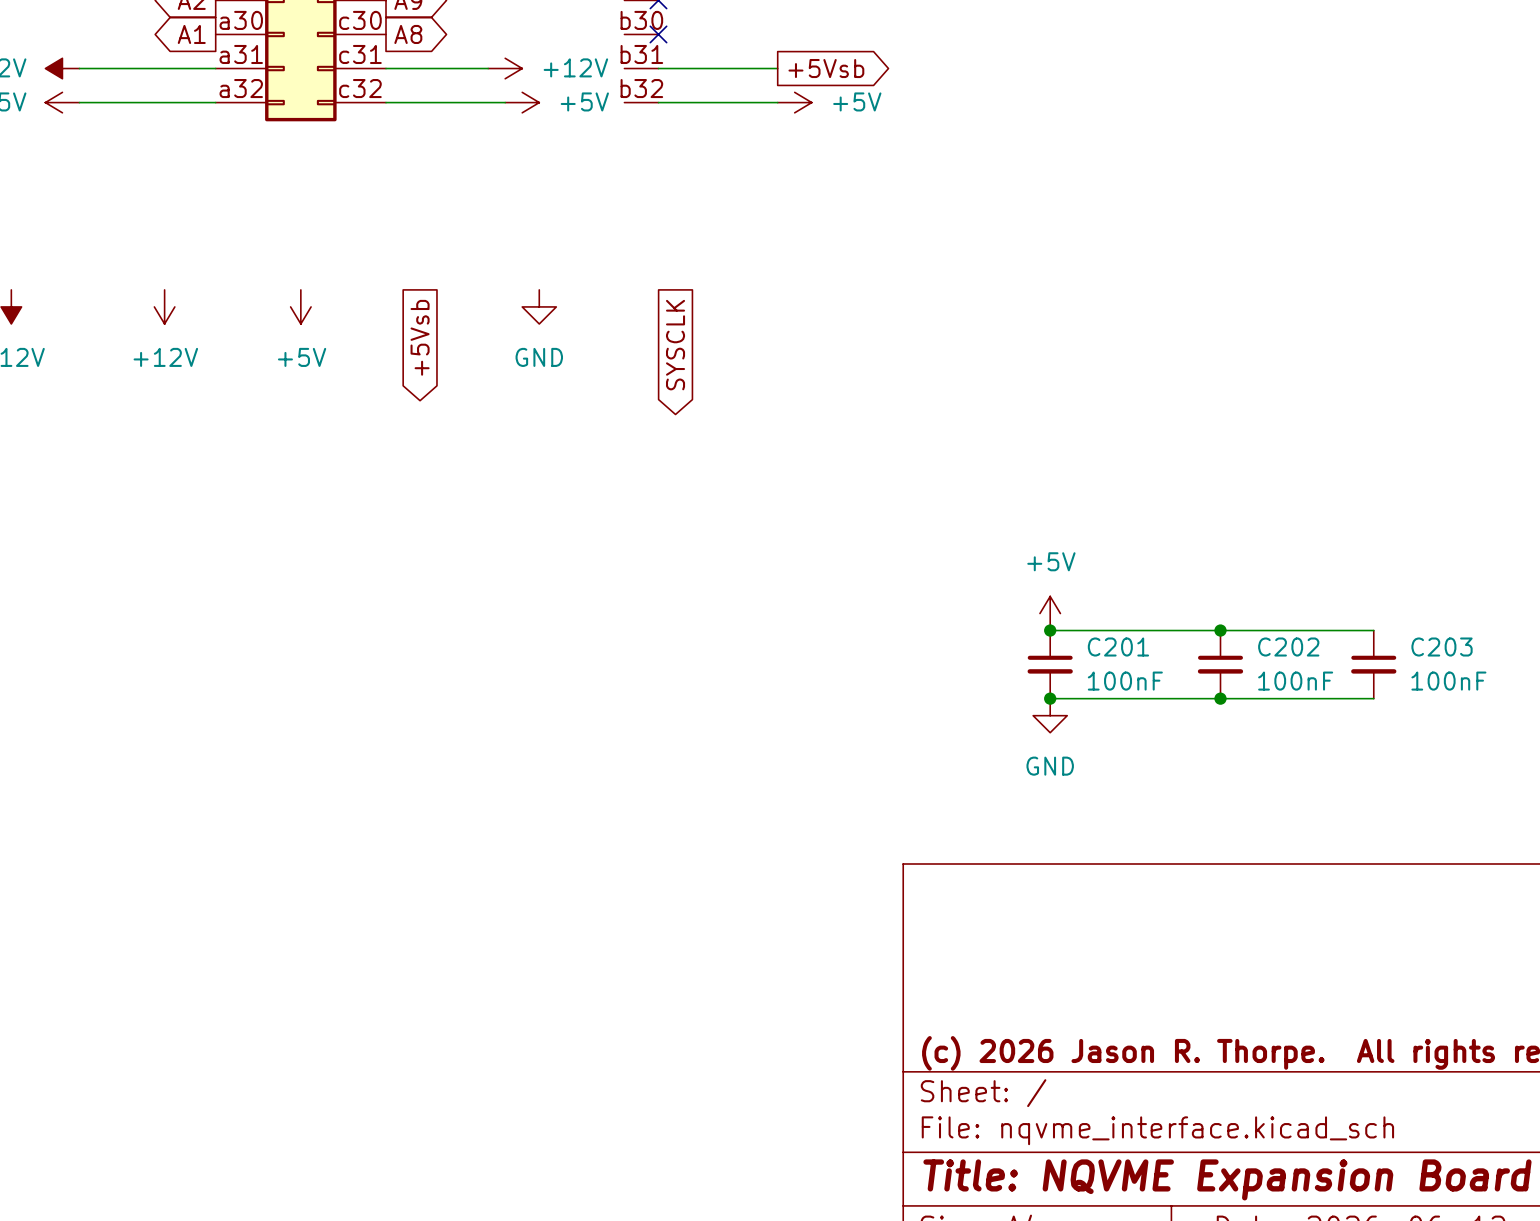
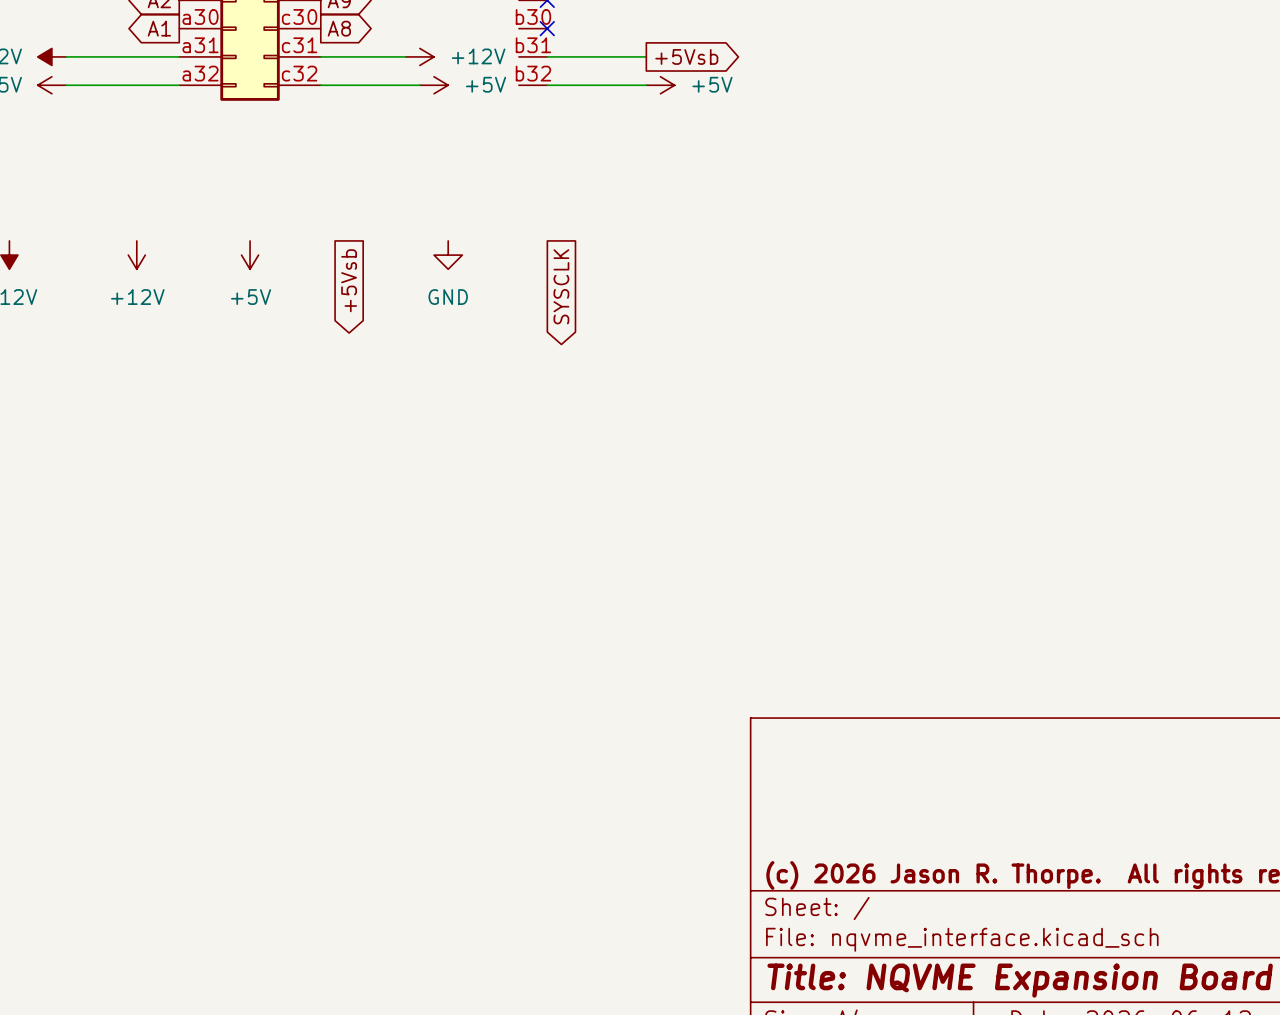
power symbol: +5V (1050, 613) -> none
wire: (1050, 630) (1373, 630) -> none
junction: (1050, 630) -> none
junction: (1220, 630) -> none
C201: 100nF (1050, 664) -> none
C202: 100nF (1220, 664) -> none
C203: 100nF (1373, 664) -> none
wire: (1050, 698) (1373, 698) -> none
junction: (1050, 698) -> none
junction: (1220, 698) -> none
power symbol: GND (1050, 715) -> none

